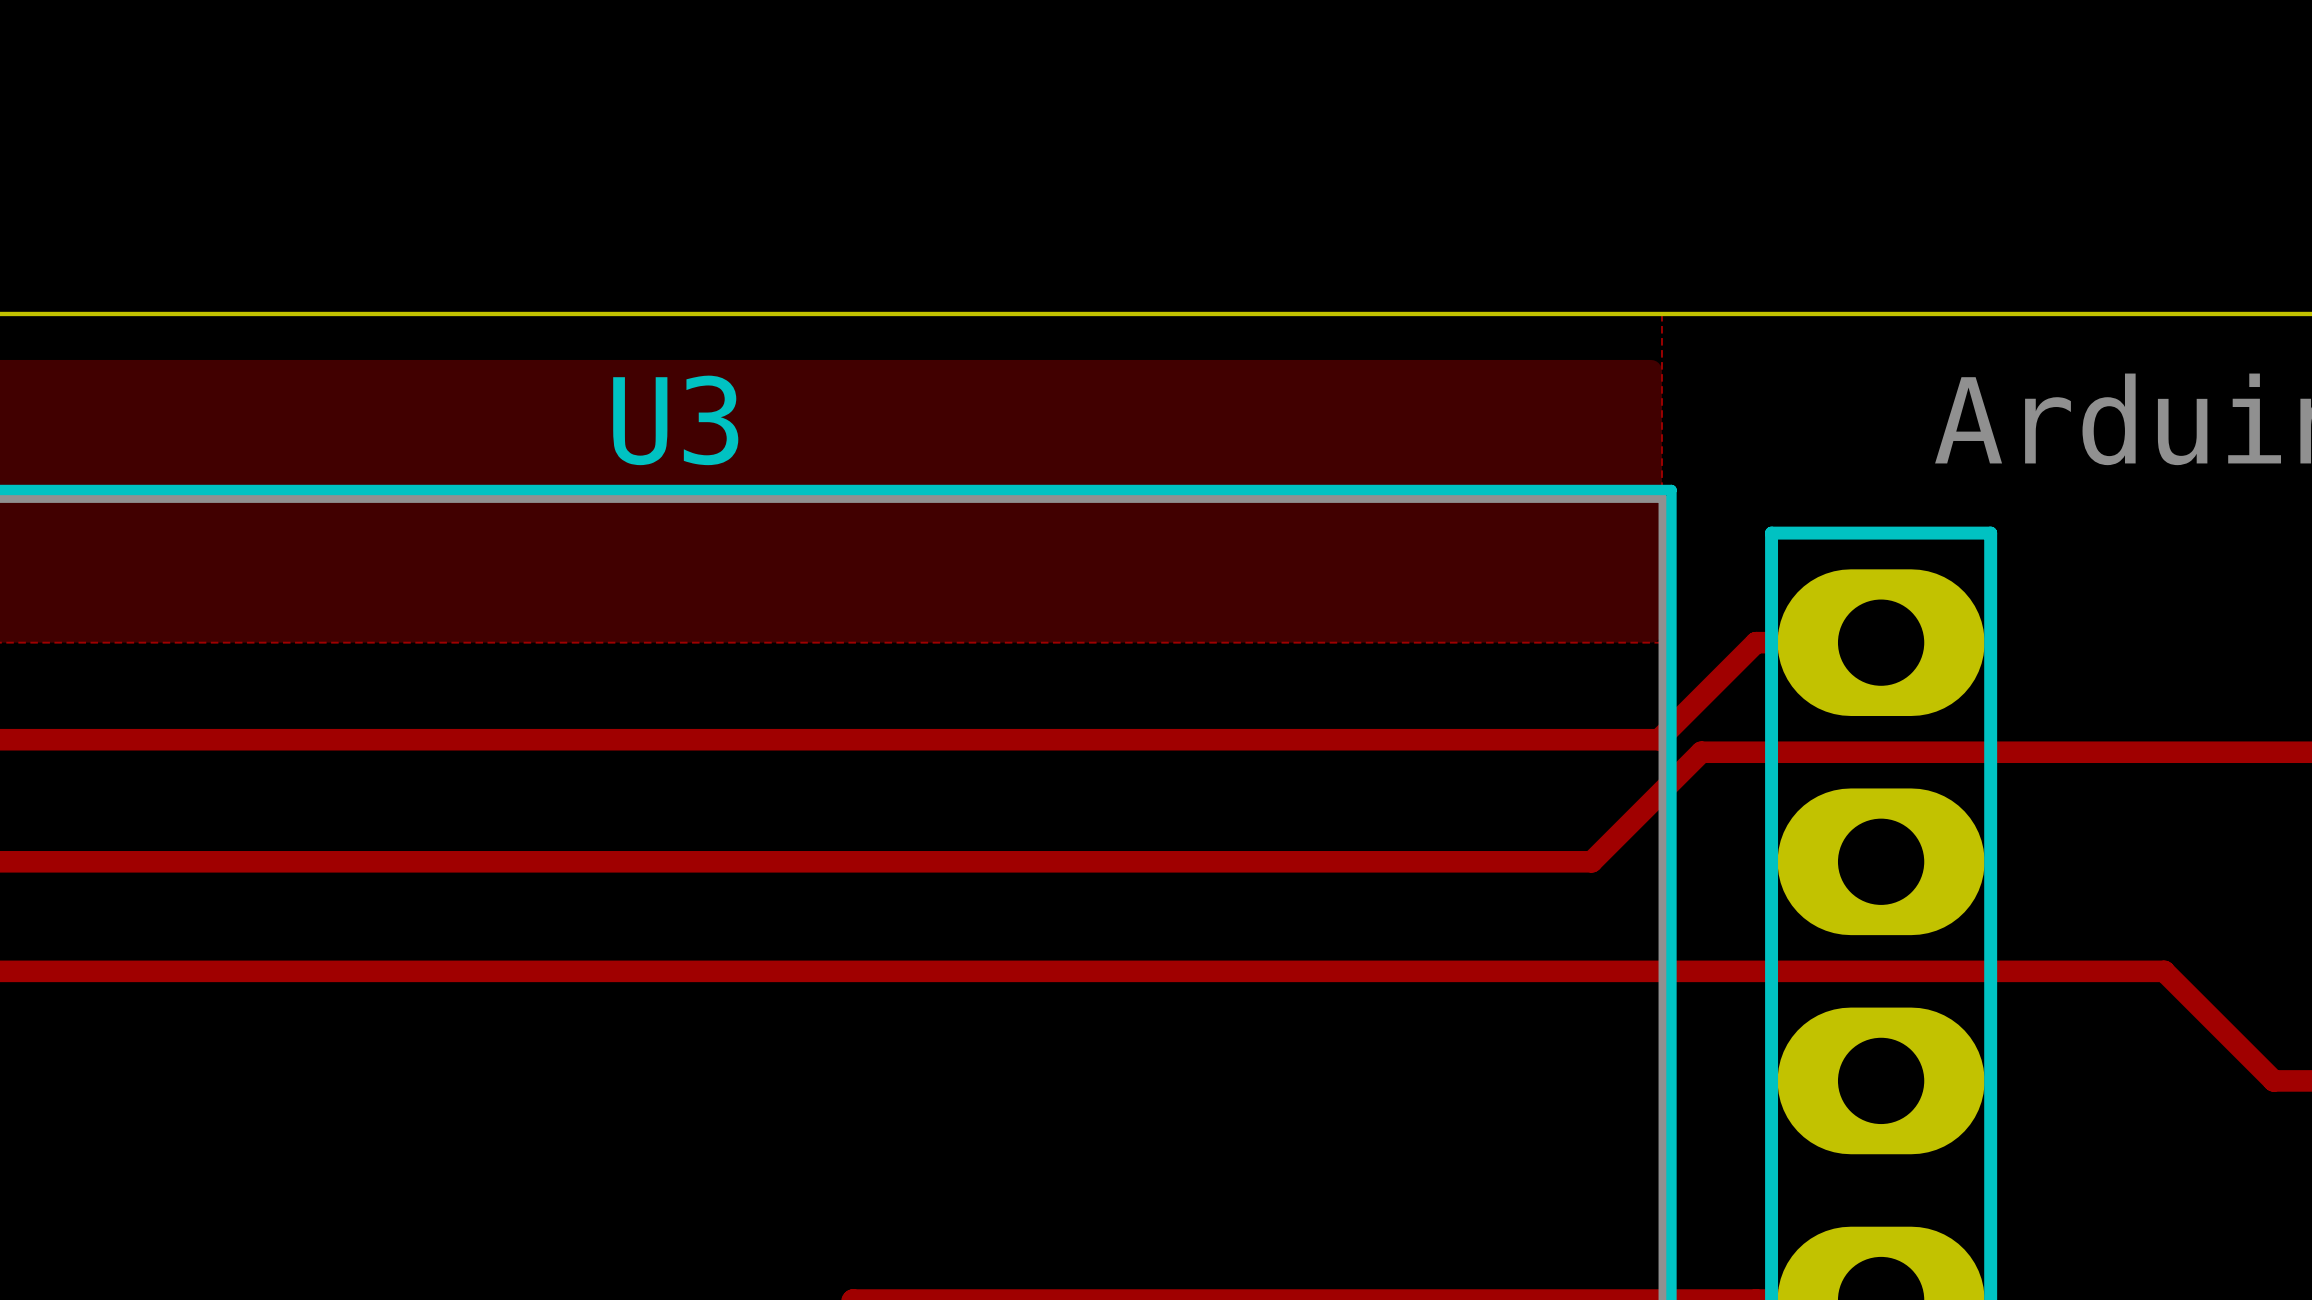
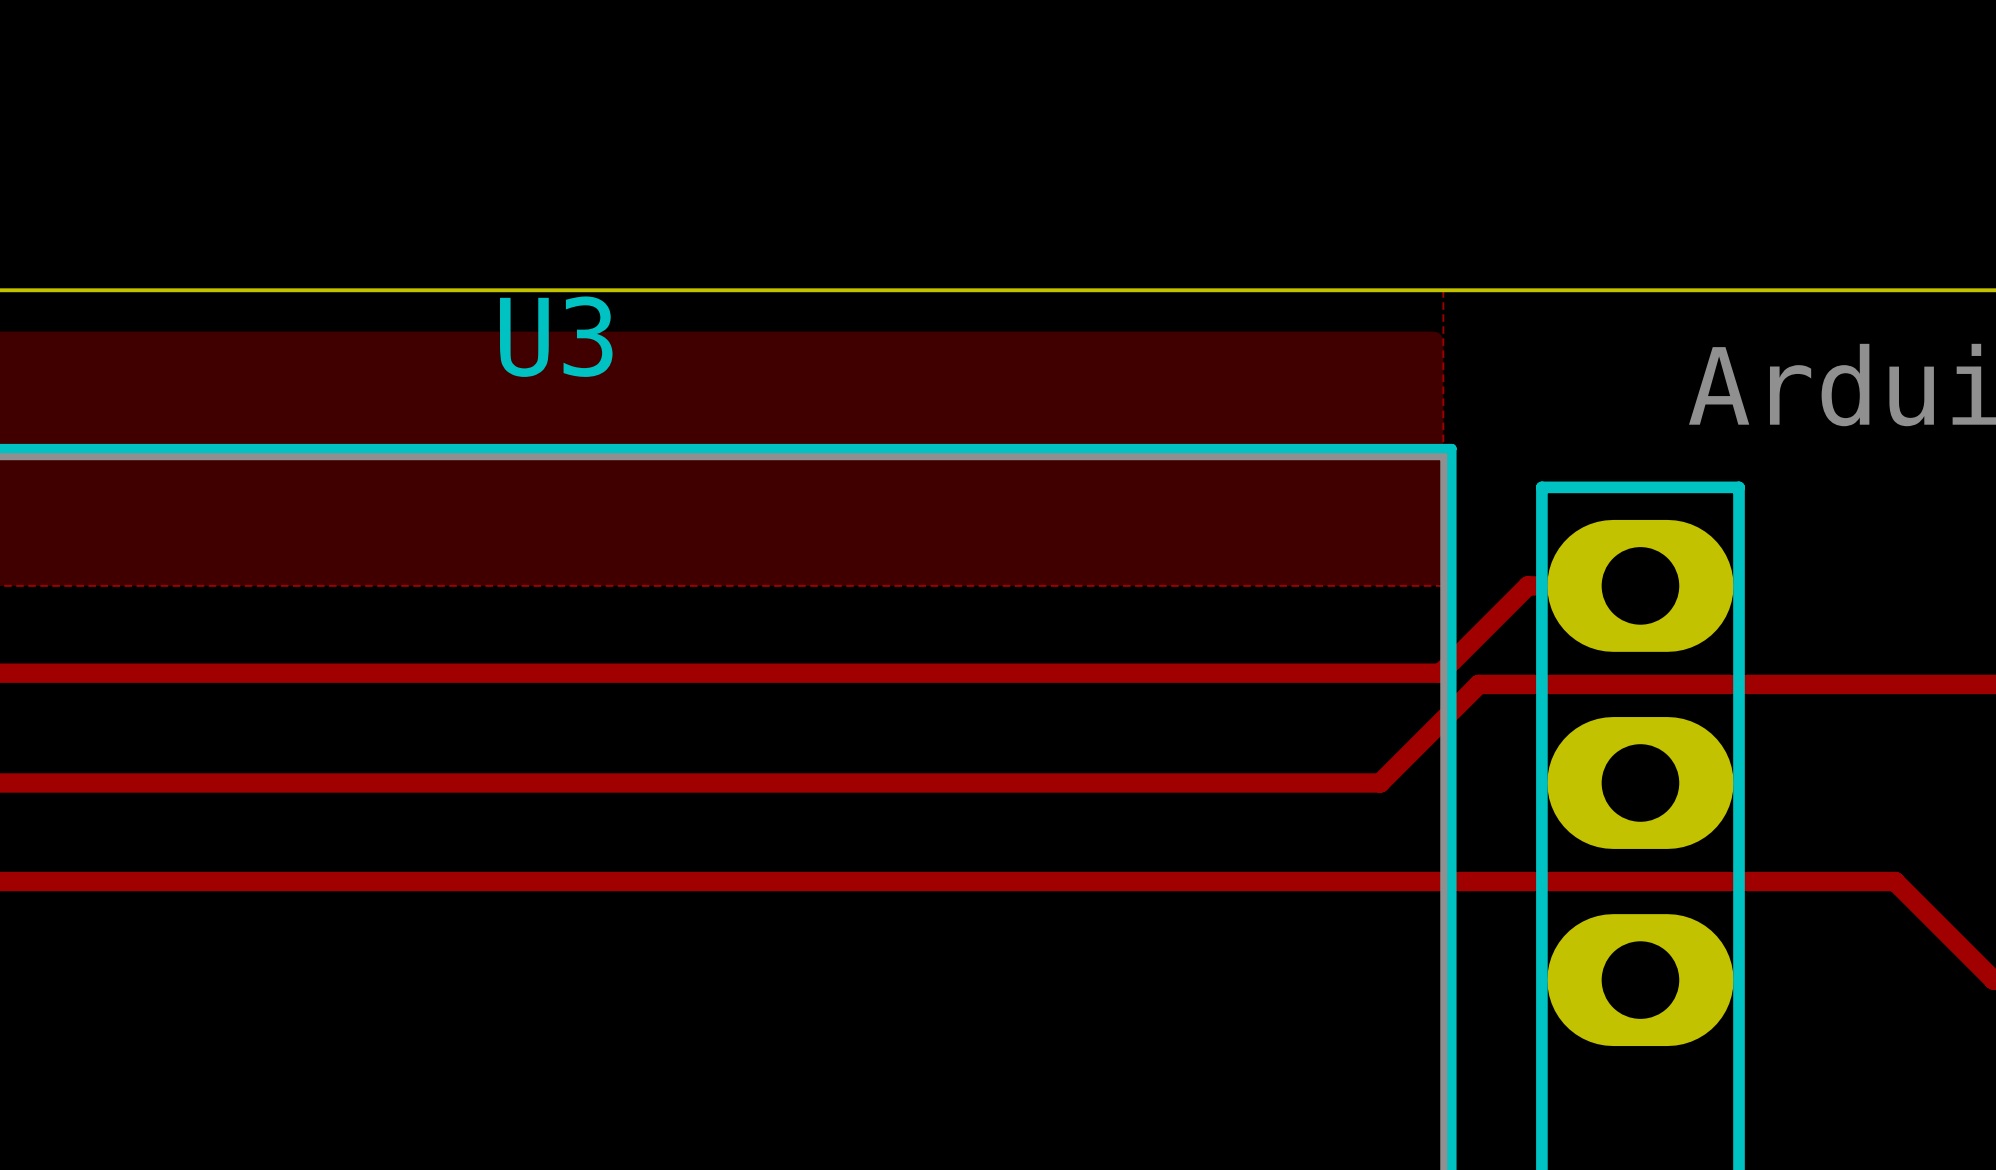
U3 name position: U3 (675, 420) -> U3 (556, 336)

